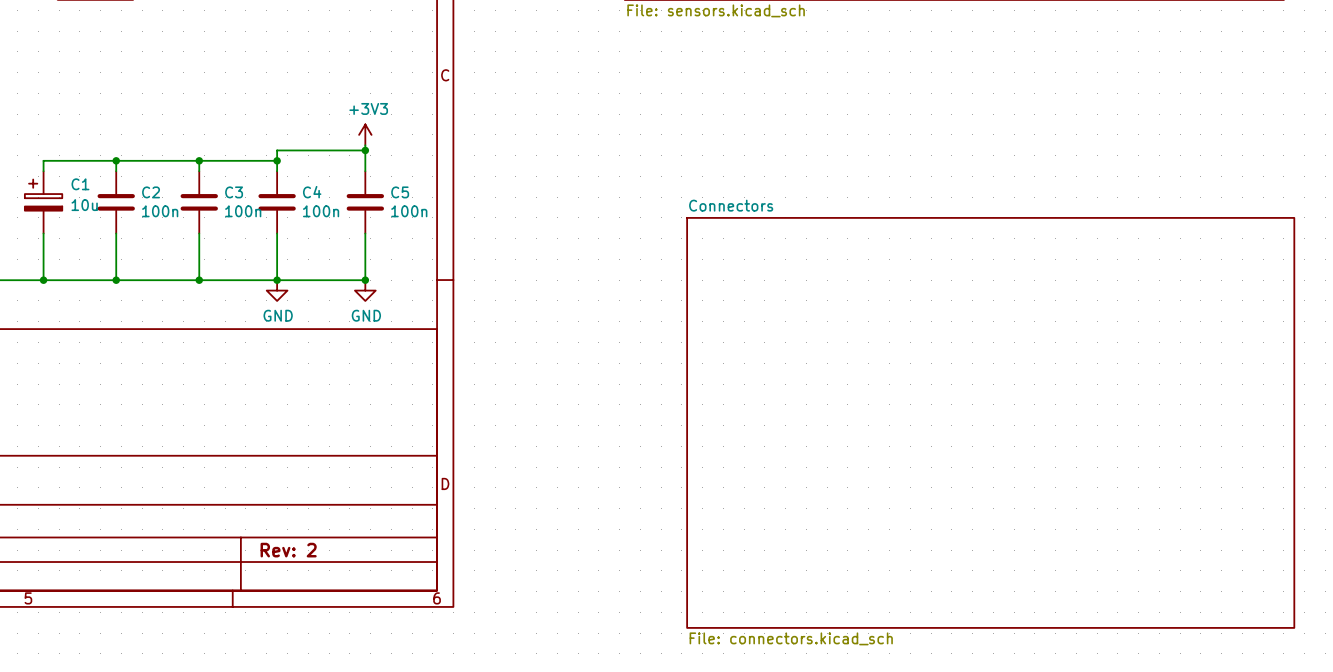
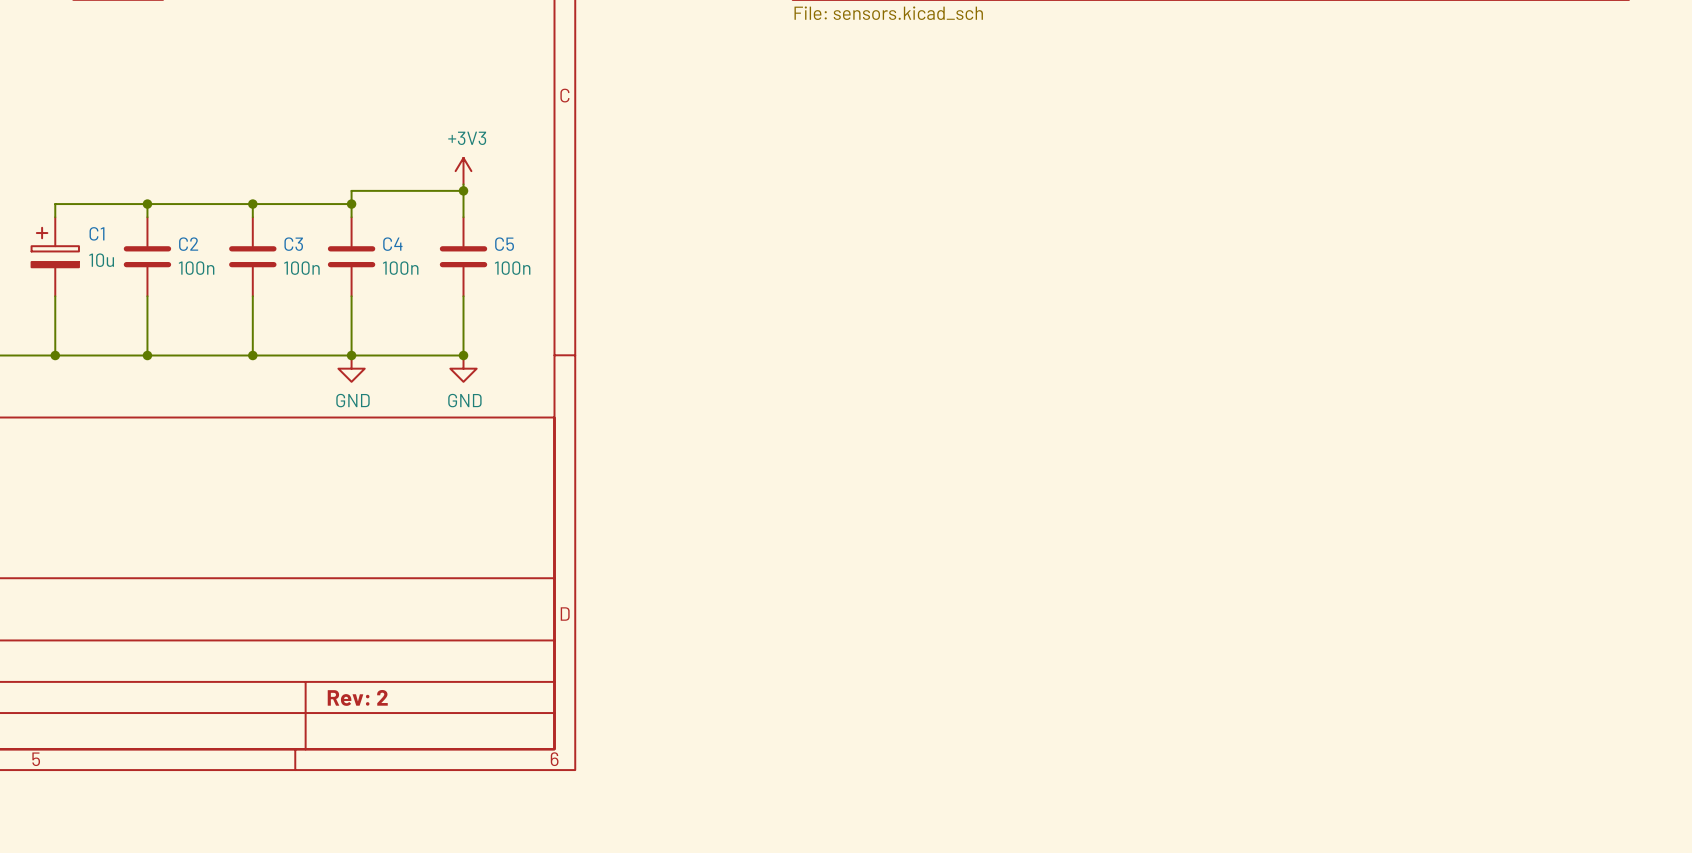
sheet Connectors: File: connectors.kicad_sch (990, 422) -> none

